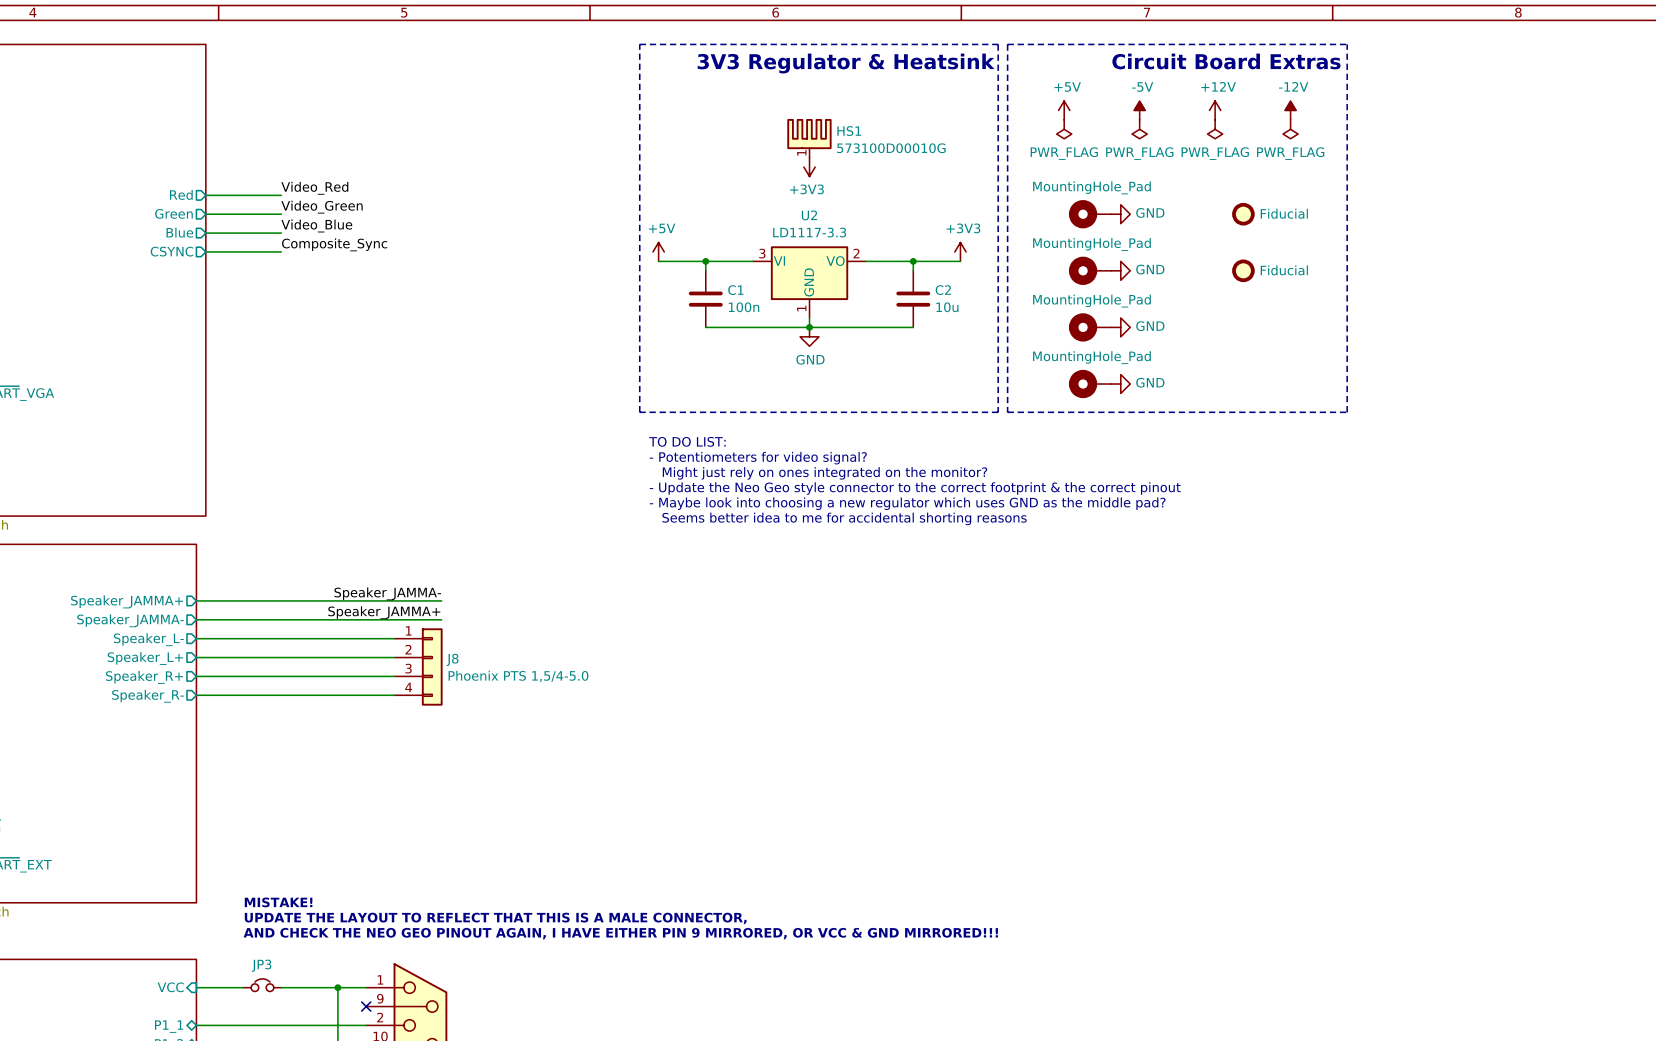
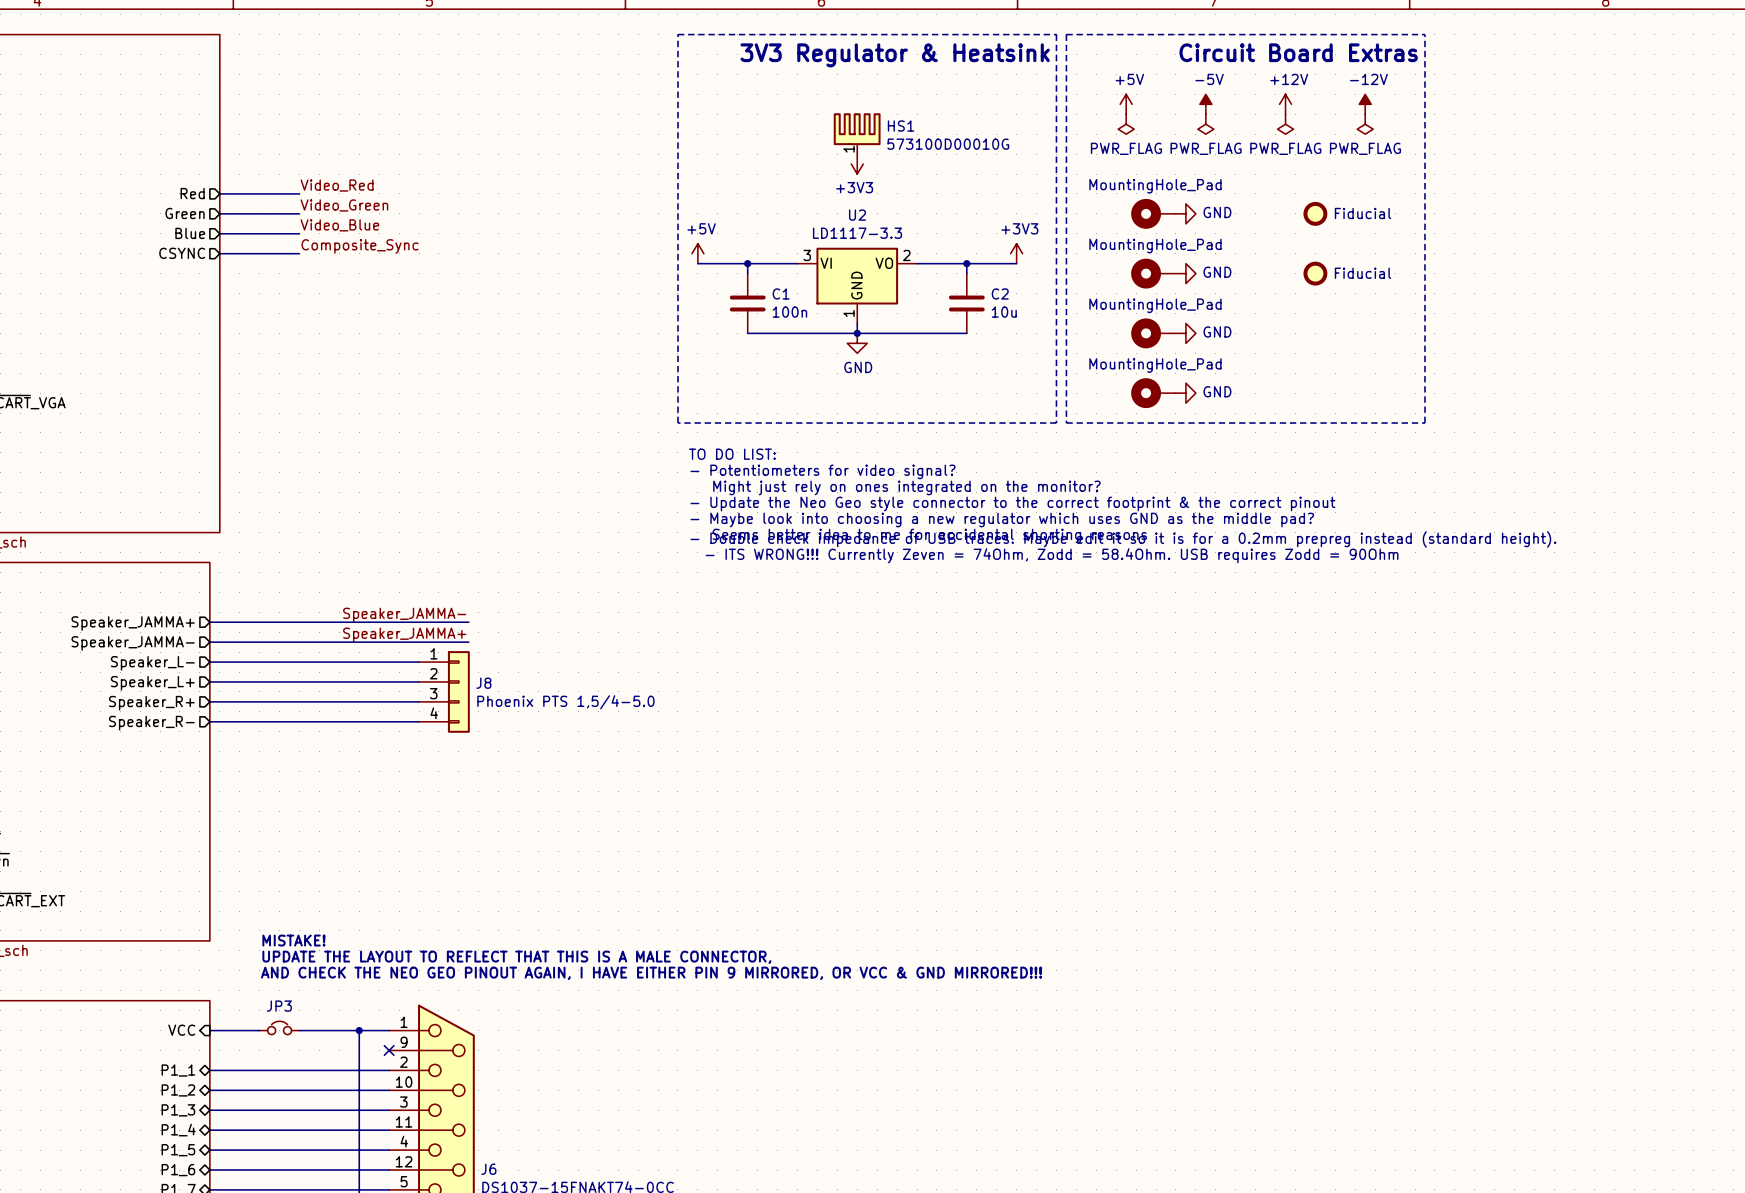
text: none -> - Double check impedance of USB traces. Maybe edit it so it is for a 0.2mm prepreg instead (standard height). (1123, 539)
text: none -> - ITS WRONG!!! Currently Zeven = 74Ohm, Zodd = 58.4Ohm. USB requires Zodd = 90Ohm (1052, 555)

